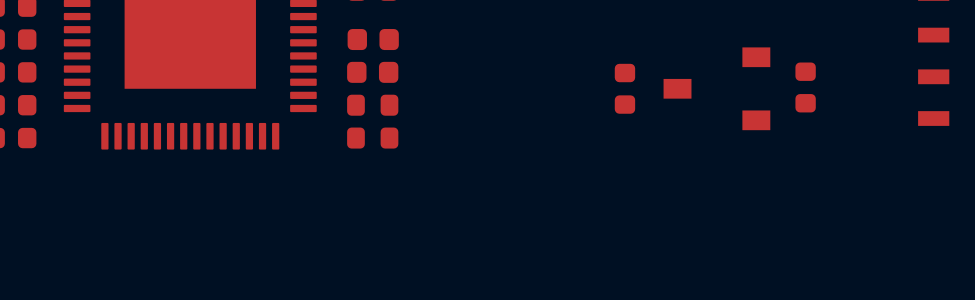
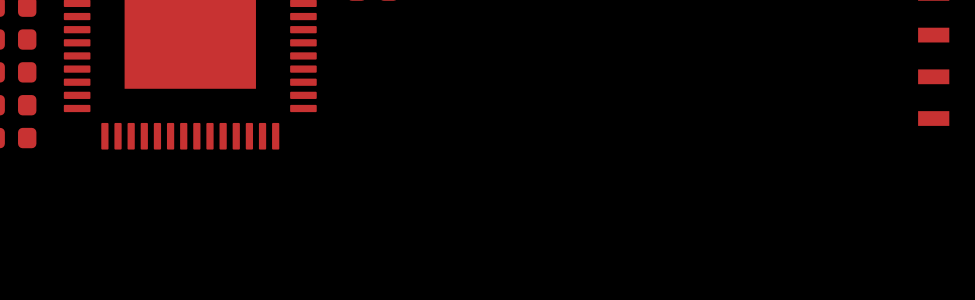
part: (373, 39) -> none
part: (372, 72) -> none
part: (805, 87) -> none
part: (624, 88) -> none
part: (716, 88) -> none
part: (372, 105) -> none
part: (372, 138) -> none

